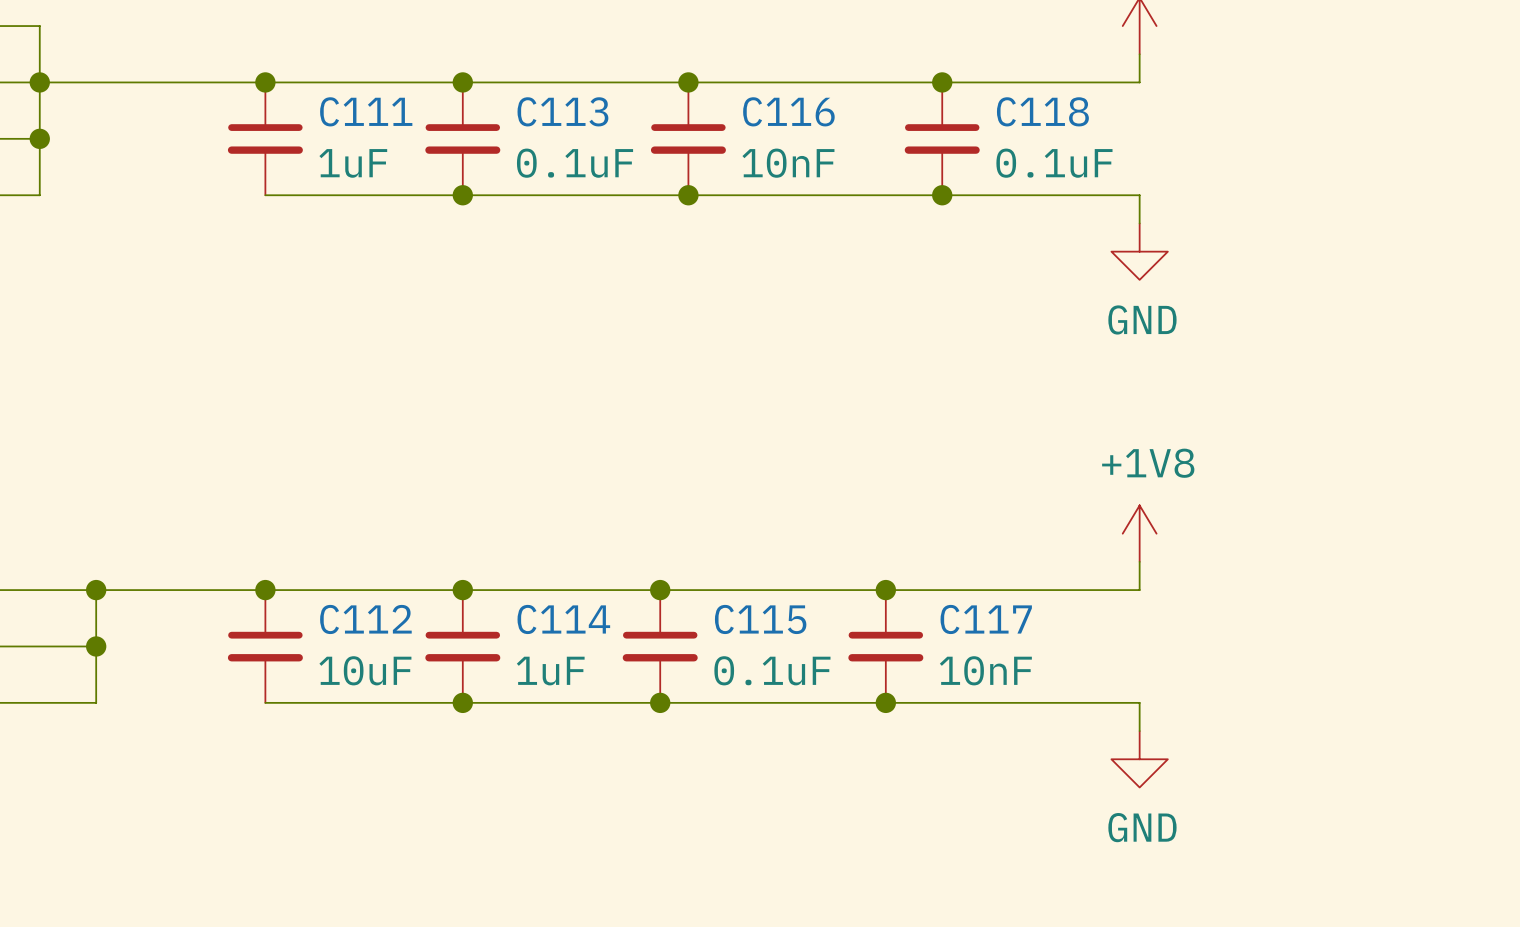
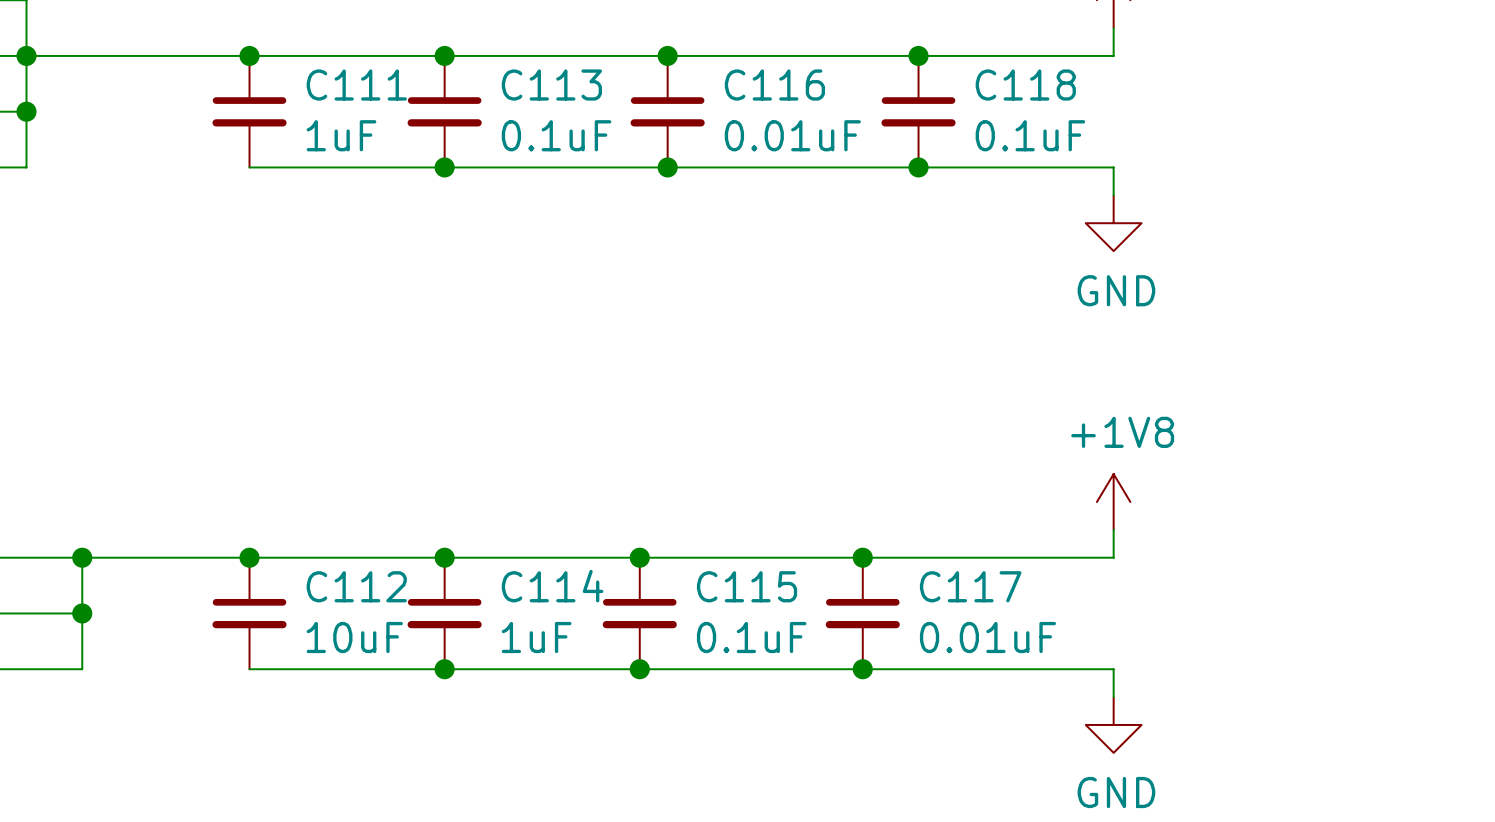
C116 value: 10nF (788, 163) -> 0.01uF (792, 135)
C117 value: 10nF (985, 670) -> 0.01uF (987, 637)

